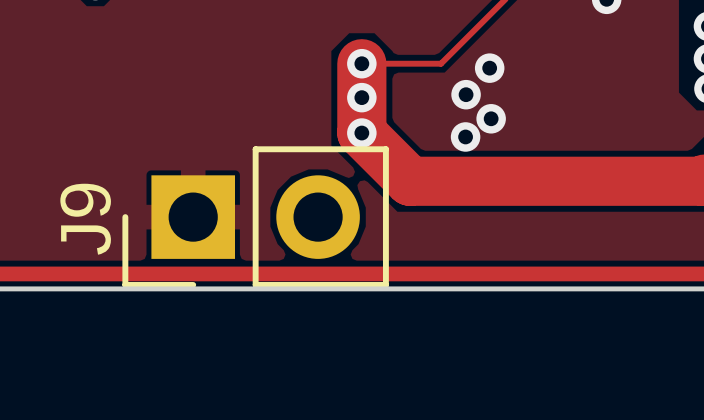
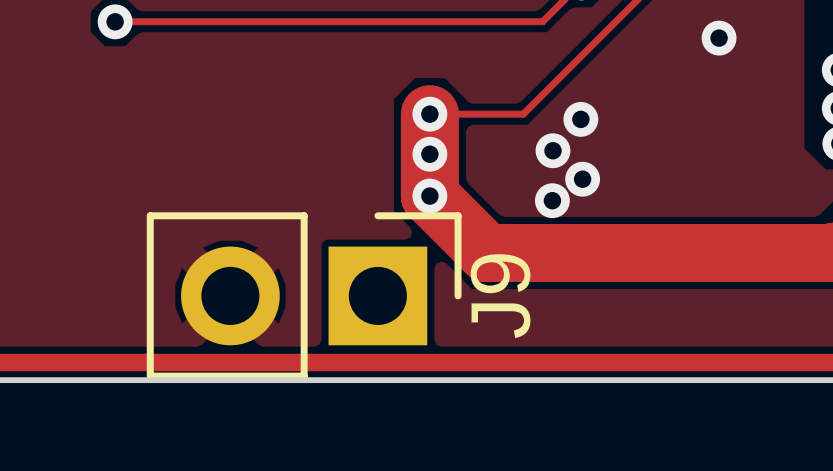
J9 rotation: 0° (255, 217) -> 180° (304, 295)

